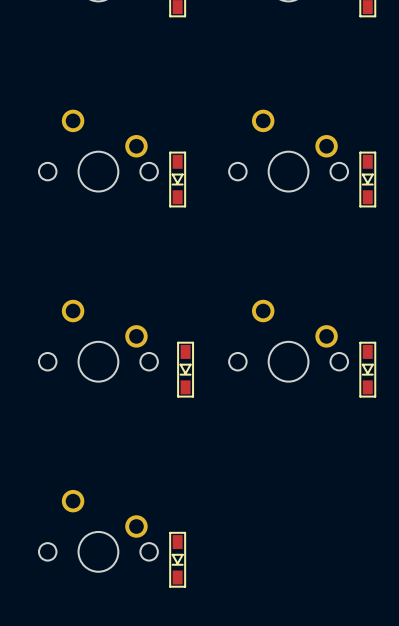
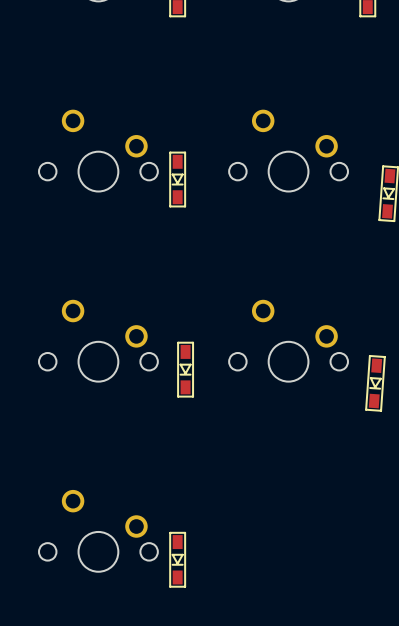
part: (367, 179) -> none
part: none -> (388, 193)
part: (367, 369) -> none
part: none -> (375, 383)

